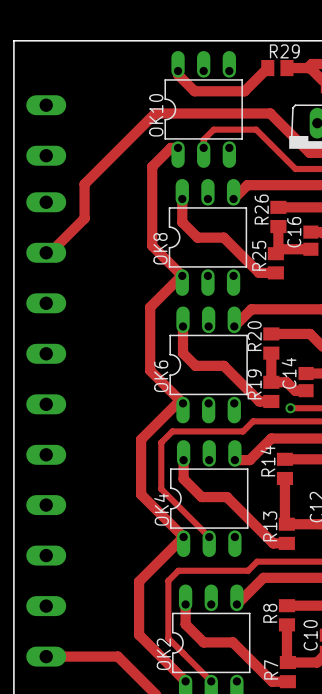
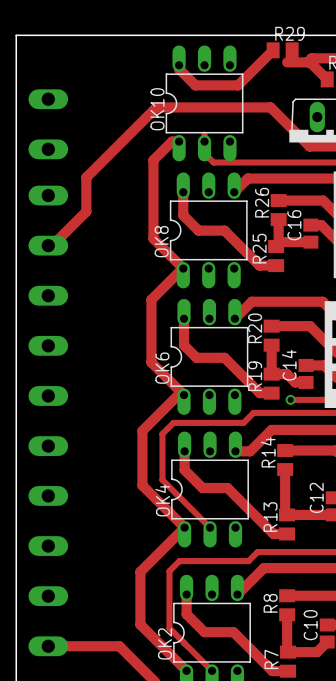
track: (267, 68) (244, 91) (237, 91) -> (273, 50) (238, 85)
R29 position: (277, 68) -> (282, 50)
track: (203, 140) (213, 129) (256, 129) (295, 169) -> (204, 141) (204, 153) (213, 162) (295, 162)

